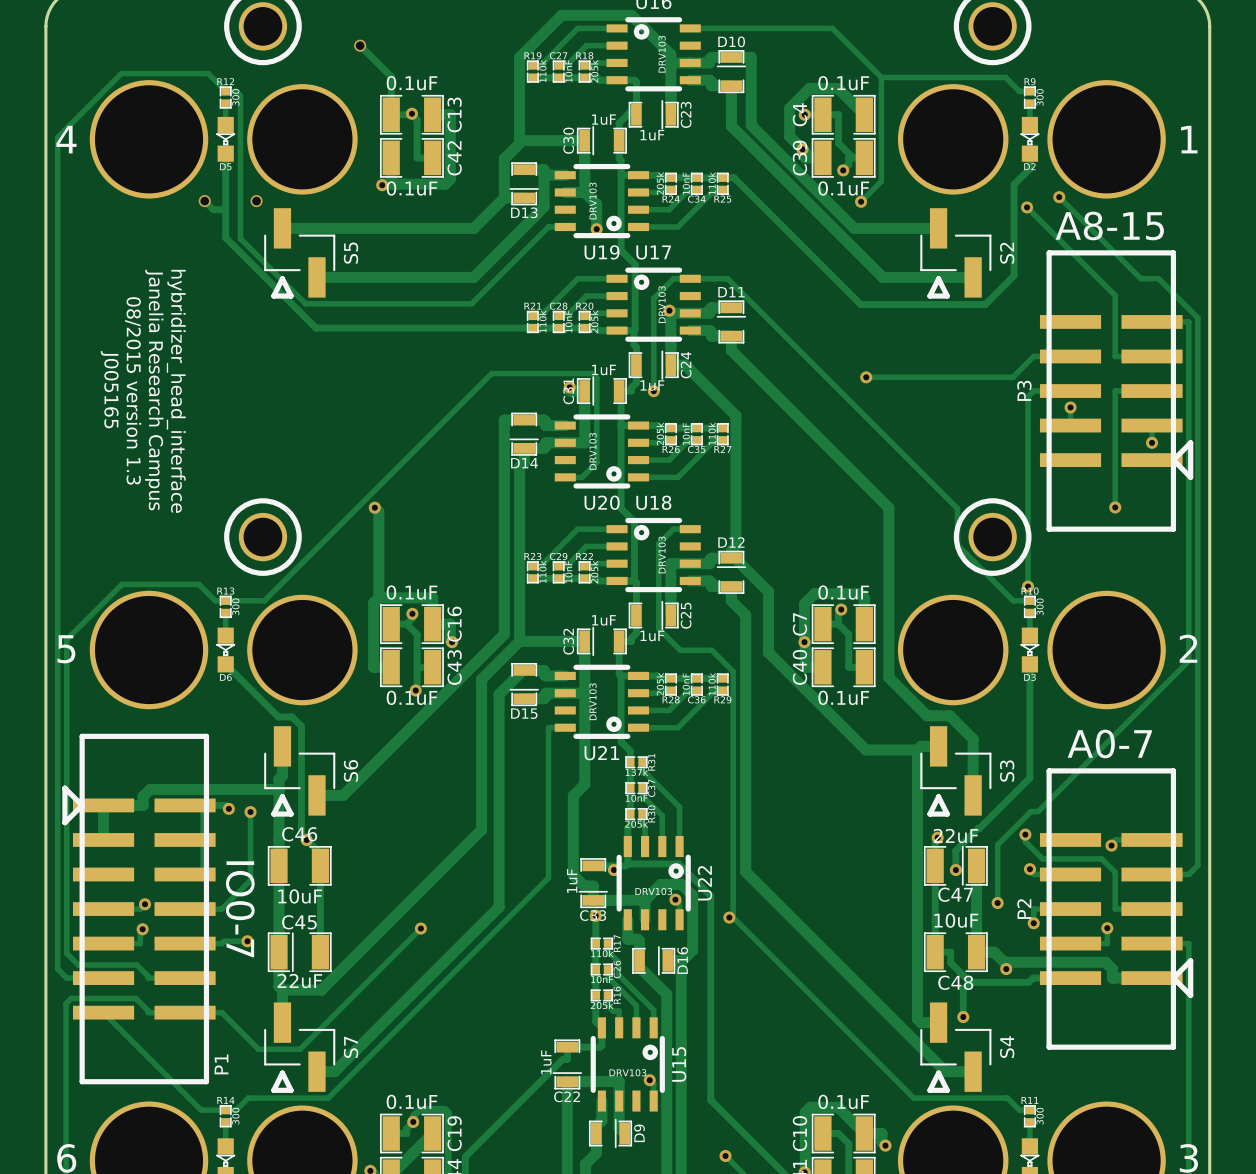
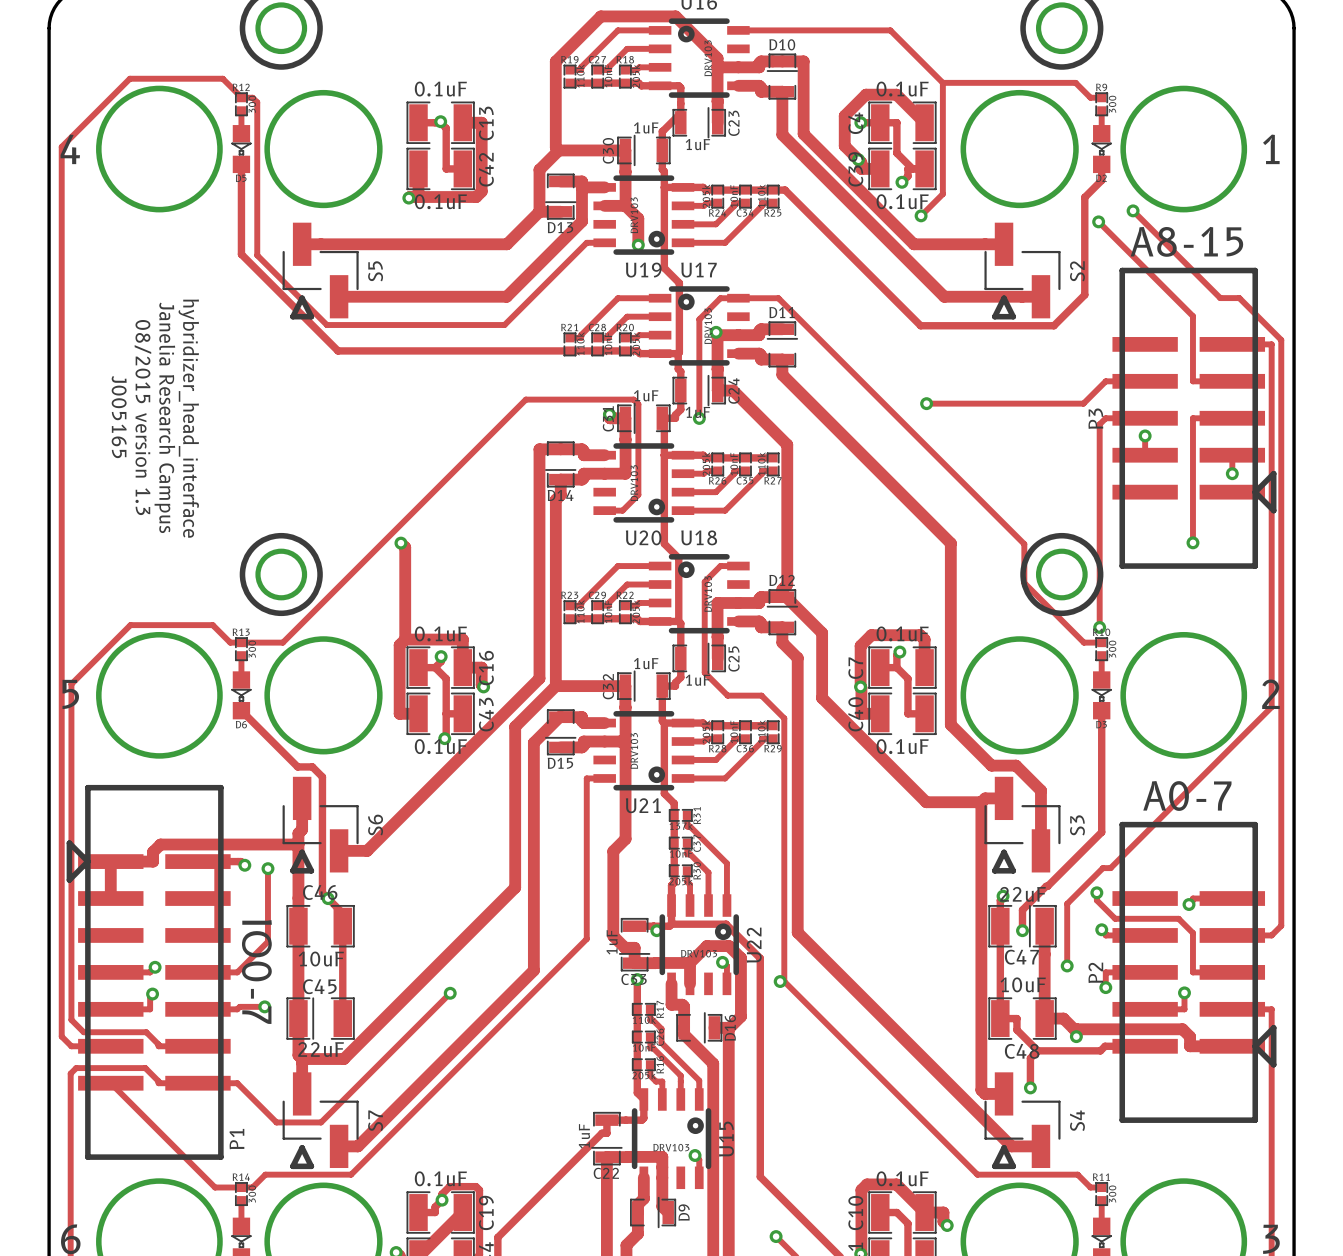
track: (360, 45) (391, 76) (391, 114) -> none
via: (360, 45) -> none
track: (204, 201) (213, 209) (225, 209) -> none
via: (204, 201) -> none
via: (256, 201) -> none

